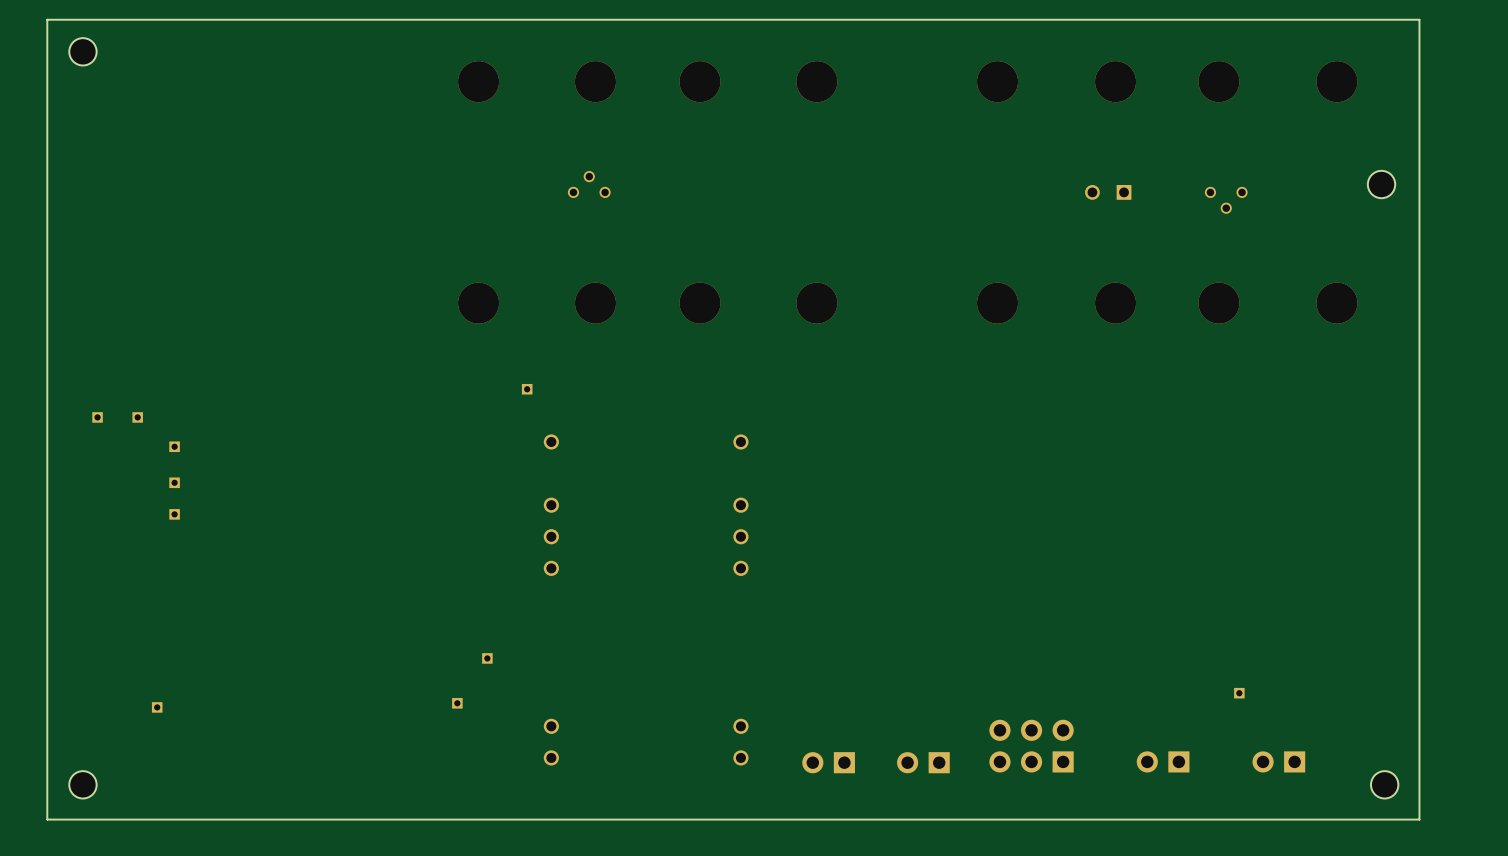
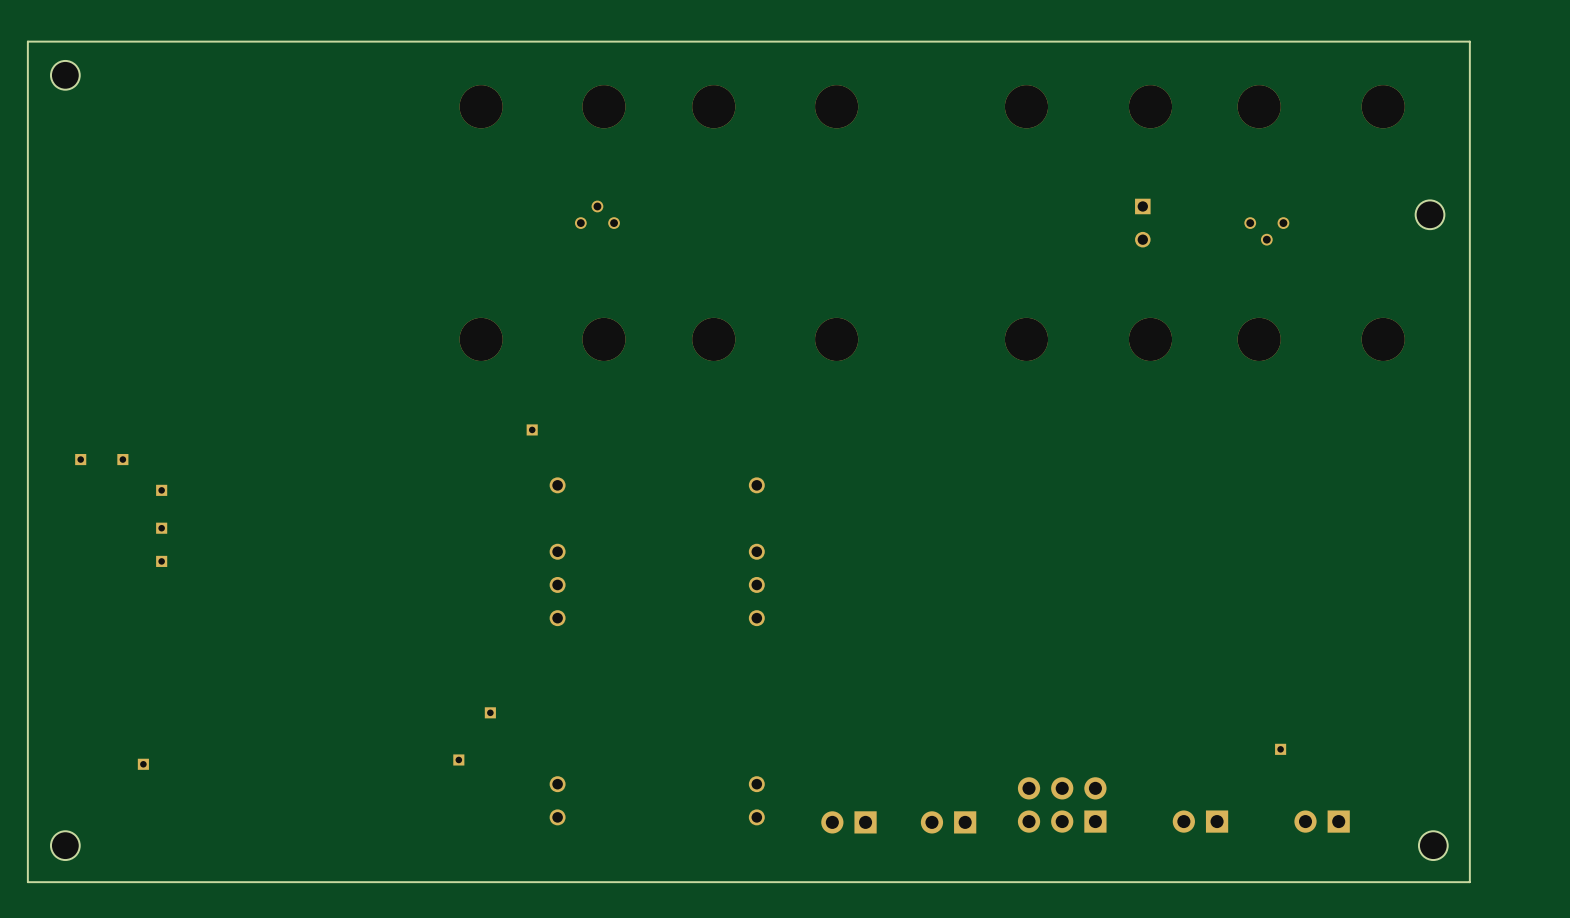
part rotation: 0° (1108, 192) -> 90° counterclockwise (1142, 223)

